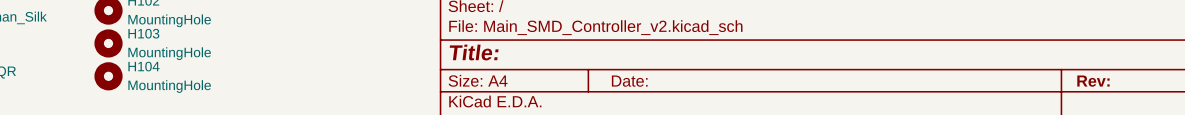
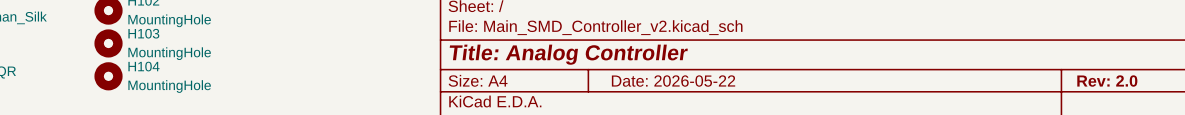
title block: Title: (474, 52) -> Title: Analog Controller (568, 54)
title block: Date: (629, 81) -> Date: 2026-05-22 (673, 81)
title block: Rev: (1093, 81) -> Rev: 2.0 (1107, 81)

